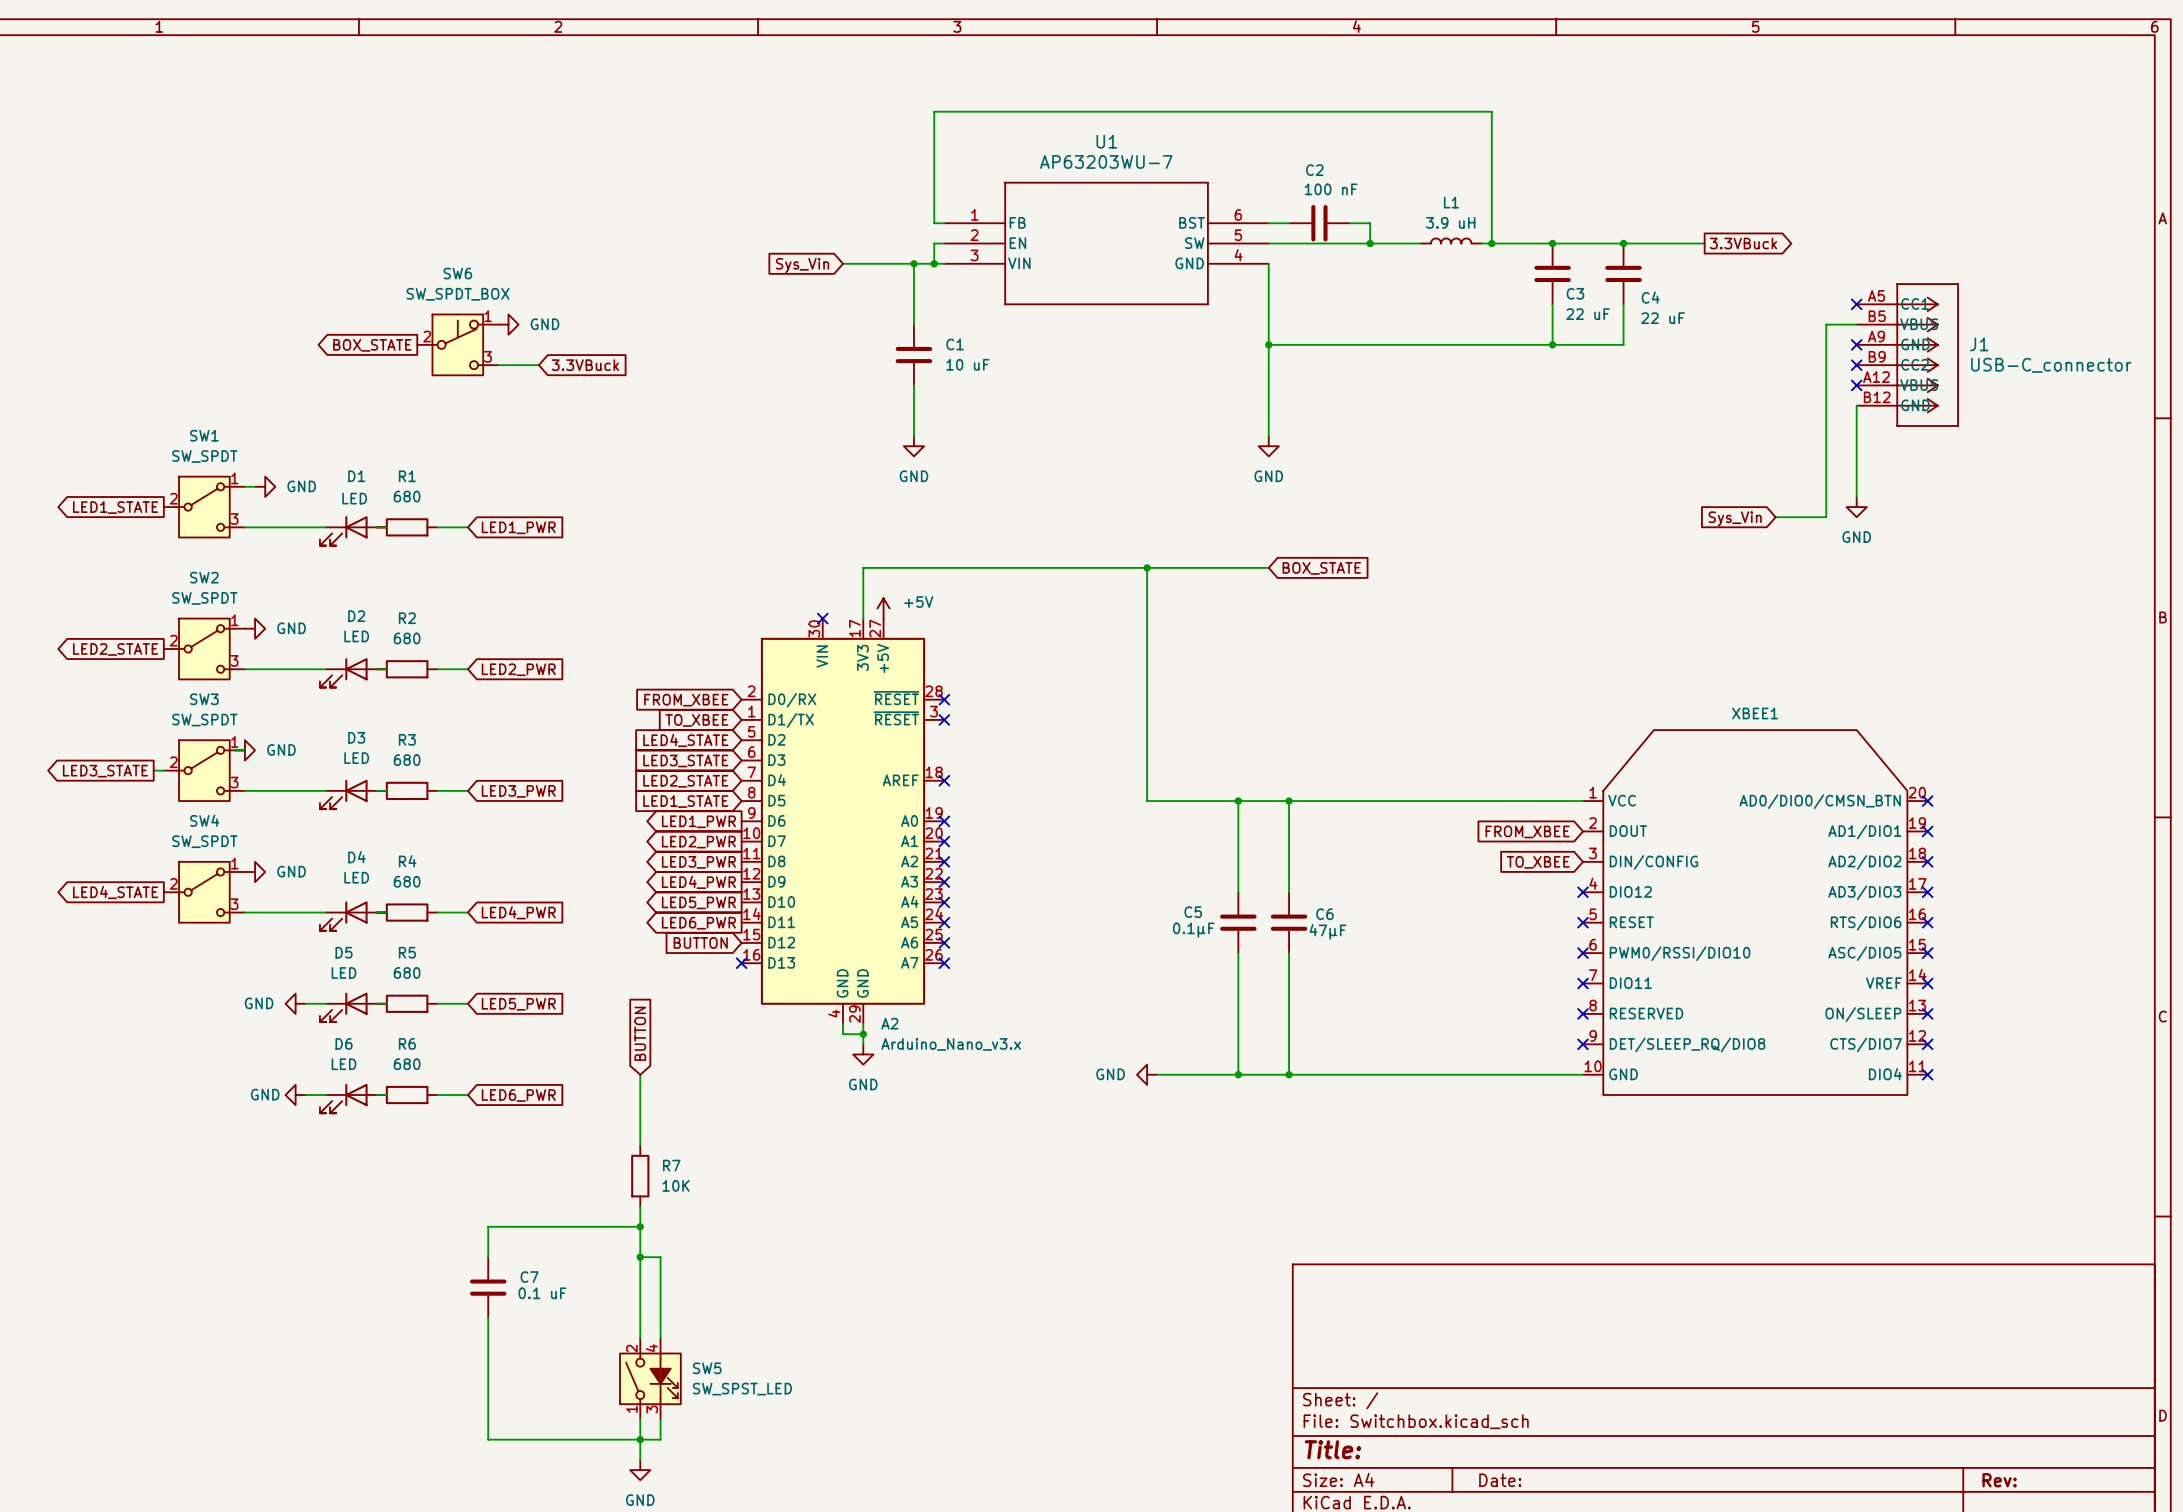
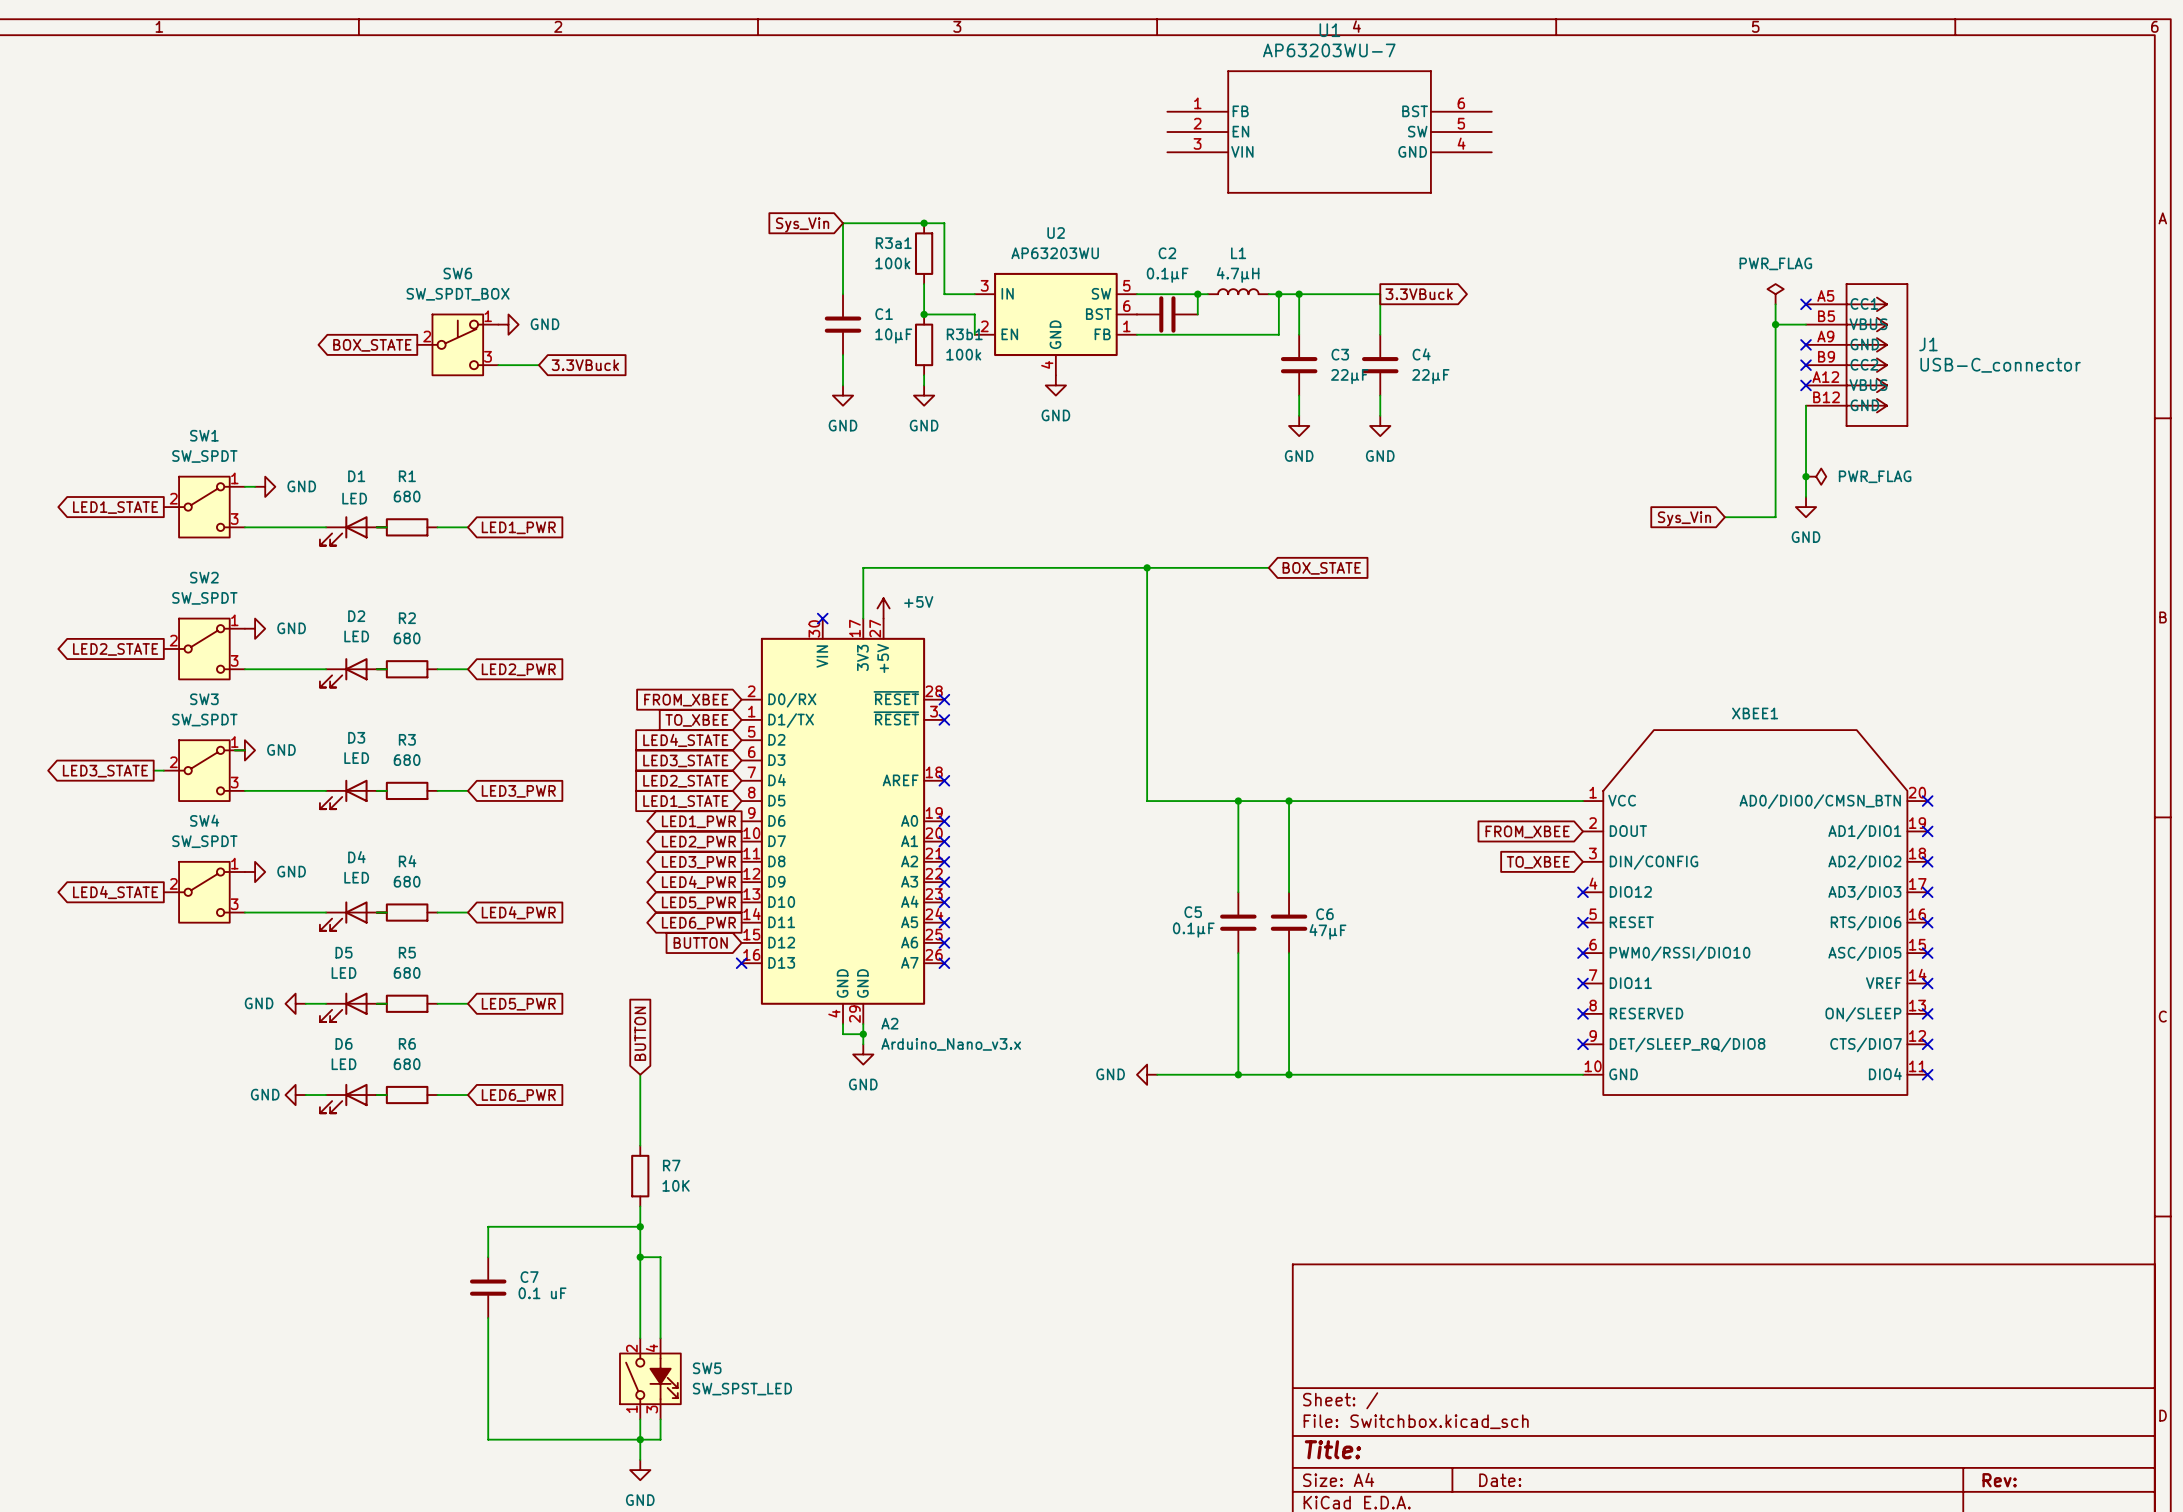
C2 name position: C2 (1314, 170) -> C2 (1167, 253)
C2 value: 100 nF (1331, 189) -> 0.1µF (1167, 275)
L1 value: 3.9 uH (1450, 222) -> 4.7µH (1238, 274)
junction: none -> (924, 223)
wire: (934, 223) (934, 111) (1491, 111) (1491, 243) -> (934, 223) (843, 223) (843, 294)
wire: none -> (944, 223) (944, 294) (974, 294)
wire: (1268, 223) (1289, 223) -> none
C2 position: (1319, 223) -> (1167, 314)
wire: (1349, 223) (1370, 223) (1370, 243) -> none
L1 position: (1451, 240) -> (1238, 291)
wire: (944, 243) (934, 243) (934, 263) -> none
U1 position: (1106, 243) -> (1329, 132)
wire: (1268, 243) (1420, 243) -> none
junction: (1370, 243) -> none
wire: (1481, 243) (1704, 243) -> none
junction: (1491, 243) -> none
junction: (1552, 243) -> none
junction: (1623, 243) -> none
global label: 3.3VBuck (1743, 243) -> none
R3a1: none -> 100k (924, 253)
wire: (843, 263) (944, 263) -> none
wire: (913, 263) (913, 324) -> none
junction: (913, 263) -> none
junction: (934, 263) -> none
wire: (1268, 263) (1268, 436) -> none
global label position: Sys_Vin (802, 265) -> Sys_Vin (802, 224)
C3 position: (1552, 273) -> (1299, 365)
C4 position: (1623, 273) -> (1380, 365)
wire: none -> (924, 284) (924, 314) (974, 314) (974, 334)
C3 name position: C3 (1575, 293) -> C3 (1340, 354)
wire: none -> (1136, 294) (1207, 294)
wire: none -> (1197, 294) (1197, 314)
junction: none -> (1197, 294)
wire: none -> (1268, 294) (1380, 294) (1380, 334)
wire: none -> (1278, 294) (1278, 334) (1136, 334)
junction: none -> (1278, 294)
wire: none -> (1299, 294) (1299, 334)
junction: none -> (1299, 294)
global label: none -> 3.3VBuck (1419, 294)
power symbol: none -> PWR_FLAG (1775, 294)
C4 name position: C4 (1650, 297) -> C4 (1421, 354)
wire: (1552, 304) (1552, 344) -> none
wire: (1623, 304) (1623, 344) (1268, 344) -> none
wire: none -> (1775, 304) (1775, 517) (1724, 517)
no-connect mark: none -> (1806, 304)
no-connect mark: (1856, 304) -> none
junction: none -> (924, 314)
C3 value: 22 uF (1588, 314) -> 22µF (1349, 376)
C4 value: 22 uF (1663, 318) -> 22µF (1430, 376)
U2: none -> AP63203WU (1055, 324)
wire: none -> (1775, 324) (1806, 324)
junction: none -> (1775, 324)
wire: (1856, 324) (1826, 324) (1826, 517) (1775, 517) -> none
R3b1: none -> 100k (924, 344)
junction: (1268, 344) -> none
junction: (1552, 344) -> none
no-connect mark: none -> (1806, 344)
no-connect mark: (1856, 344) -> none
wire: none -> (843, 355) (843, 385)
C1 position: (913, 355) -> (843, 324)
J1 position: (1907, 355) -> (1856, 355)
C1 value: 10 uF (967, 364) -> 10µF (893, 336)
no-connect mark: none -> (1806, 365)
no-connect mark: (1856, 365) -> none
wire: none -> (924, 375) (924, 385)
wire: (913, 385) (913, 436) -> none
power symbol: none -> GND (1055, 385)
no-connect mark: none -> (1806, 385)
no-connect mark: (1856, 385) -> none
power symbol: none -> GND (843, 395)
power symbol: none -> GND (924, 395)
wire: none -> (1299, 395) (1299, 415)
wire: none -> (1380, 395) (1380, 415)
wire: (1856, 405) (1856, 496) -> (1806, 405) (1806, 496)
power symbol: none -> GND (1380, 425)
power symbol: GND (913, 446) -> none
power symbol position: GND (1268, 446) -> GND (1299, 425)
junction: none -> (1806, 476)
power symbol: none -> PWR_FLAG (1816, 476)
power symbol position: GND (1856, 507) -> GND (1806, 507)
global label position: Sys_Vin (1735, 518) -> Sys_Vin (1684, 518)

